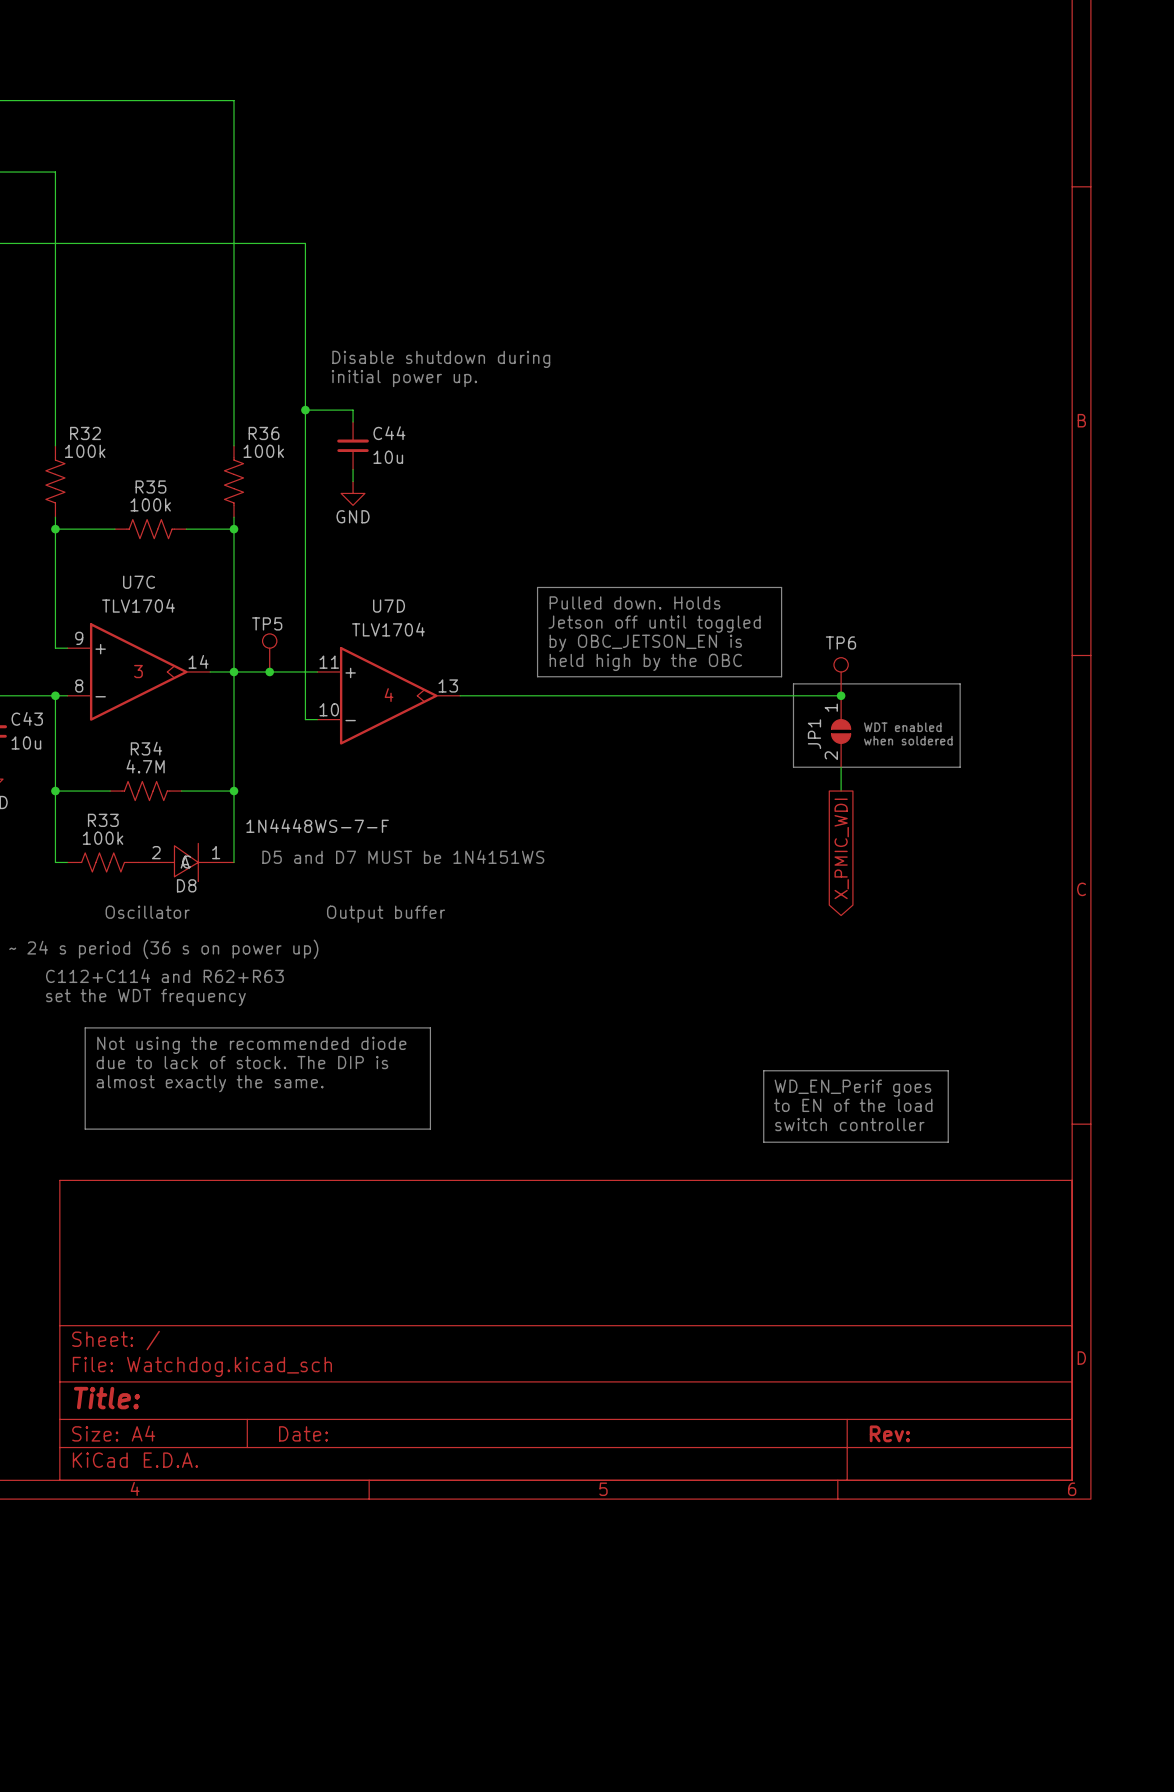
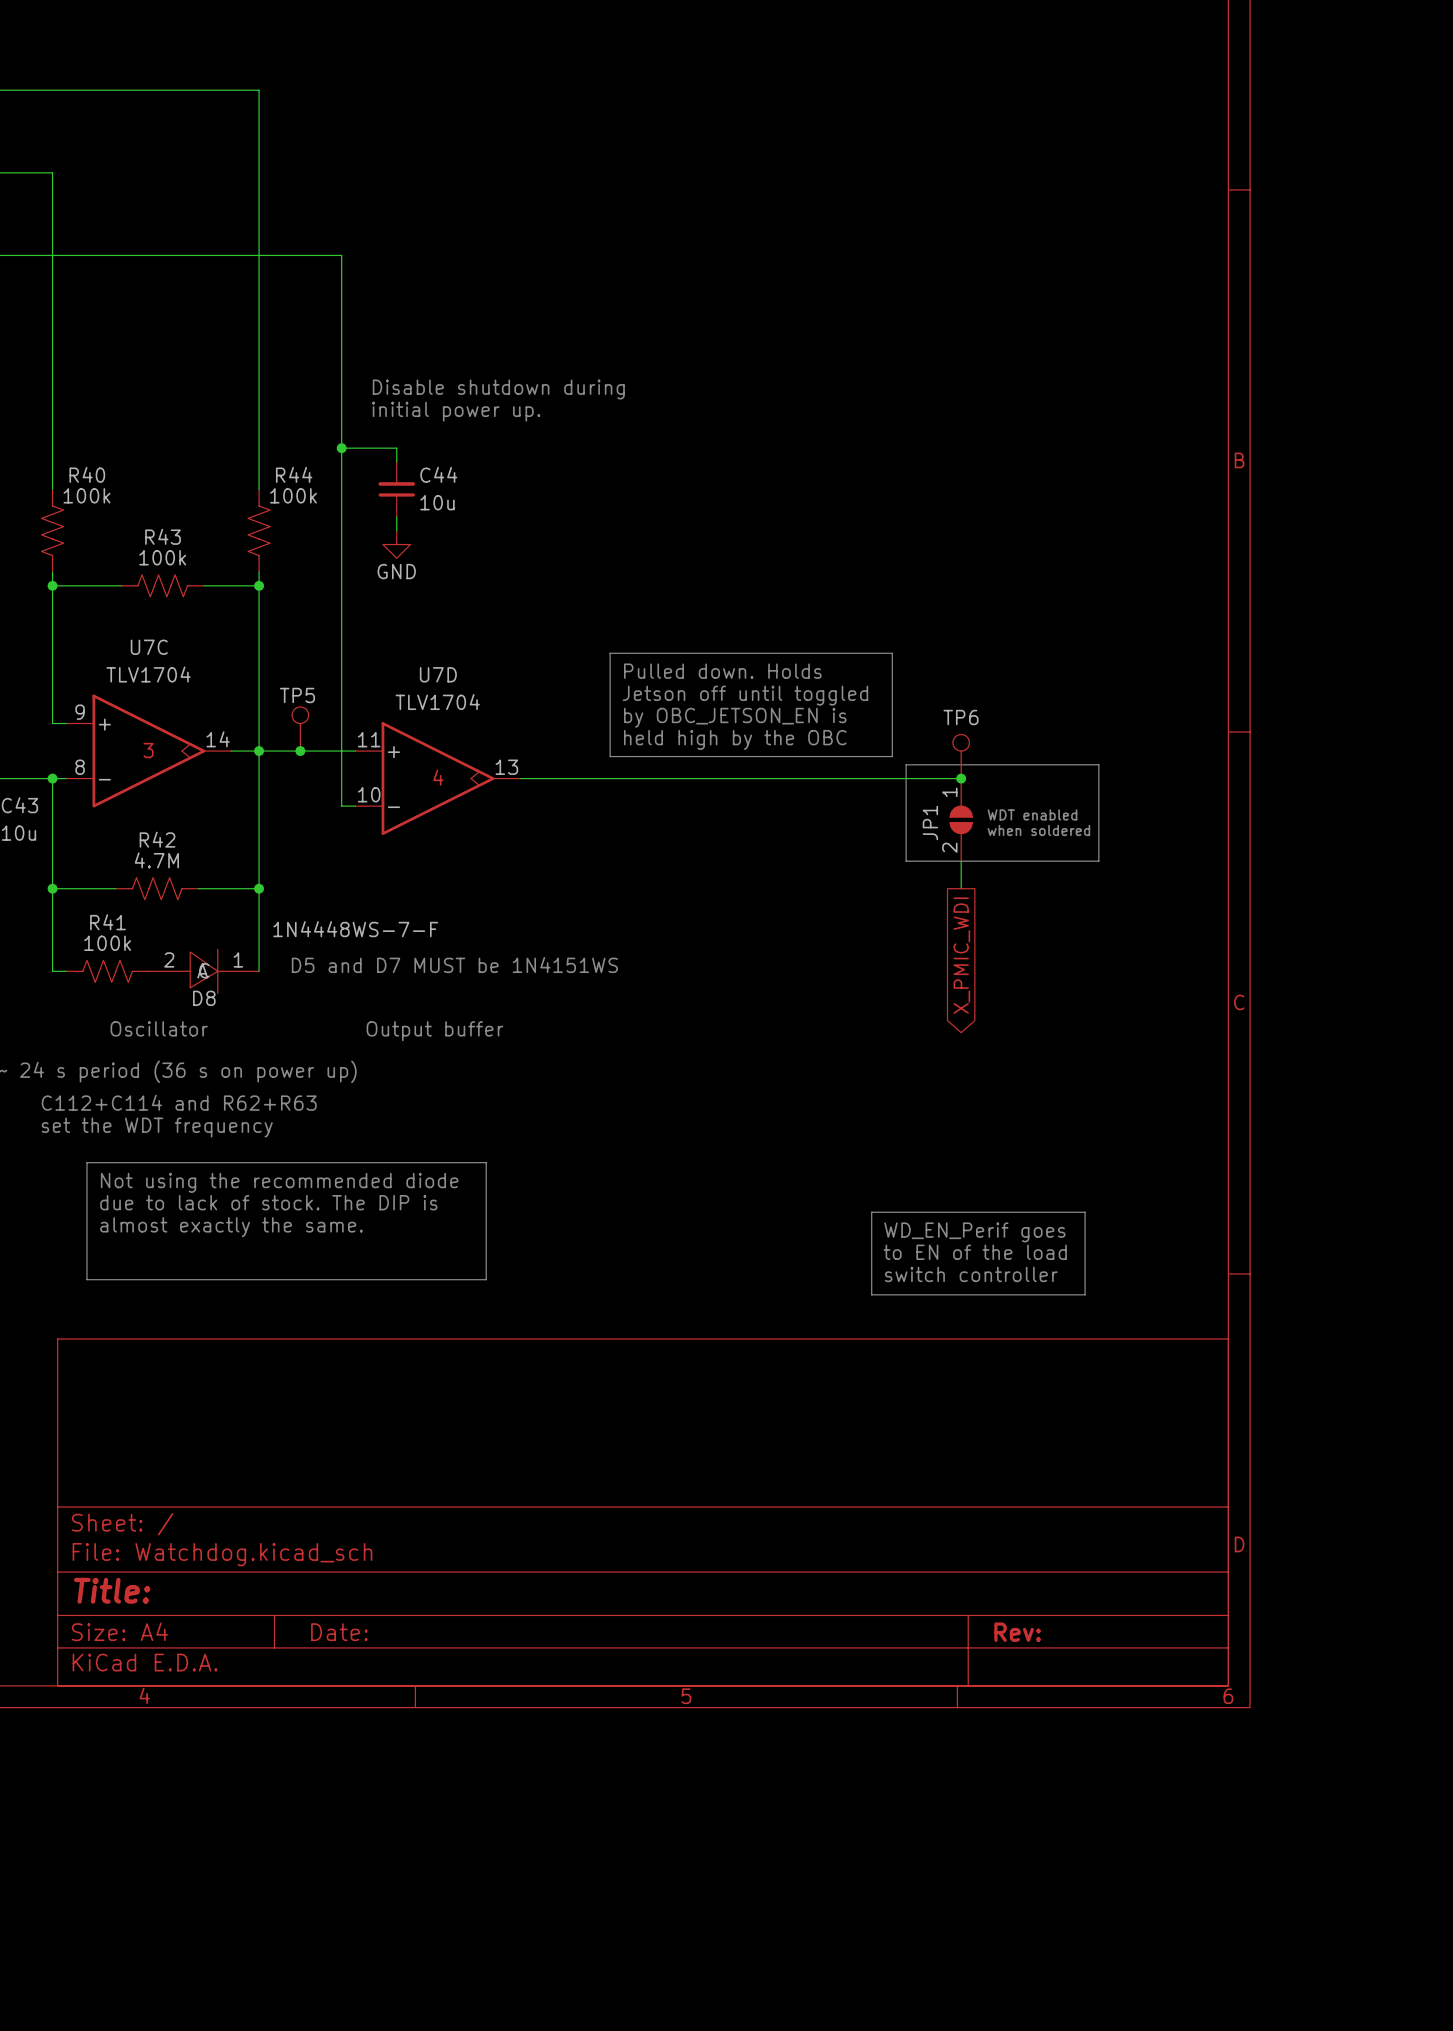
R32 name: R32 (85, 433) -> R40 (87, 474)
R36 name: R36 (264, 433) -> R44 (294, 474)
R35 name: R35 (150, 487) -> R43 (163, 536)
R34 name: R34 (146, 748) -> R42 (157, 839)
R33 name: R33 (103, 820) -> R41 (107, 922)

